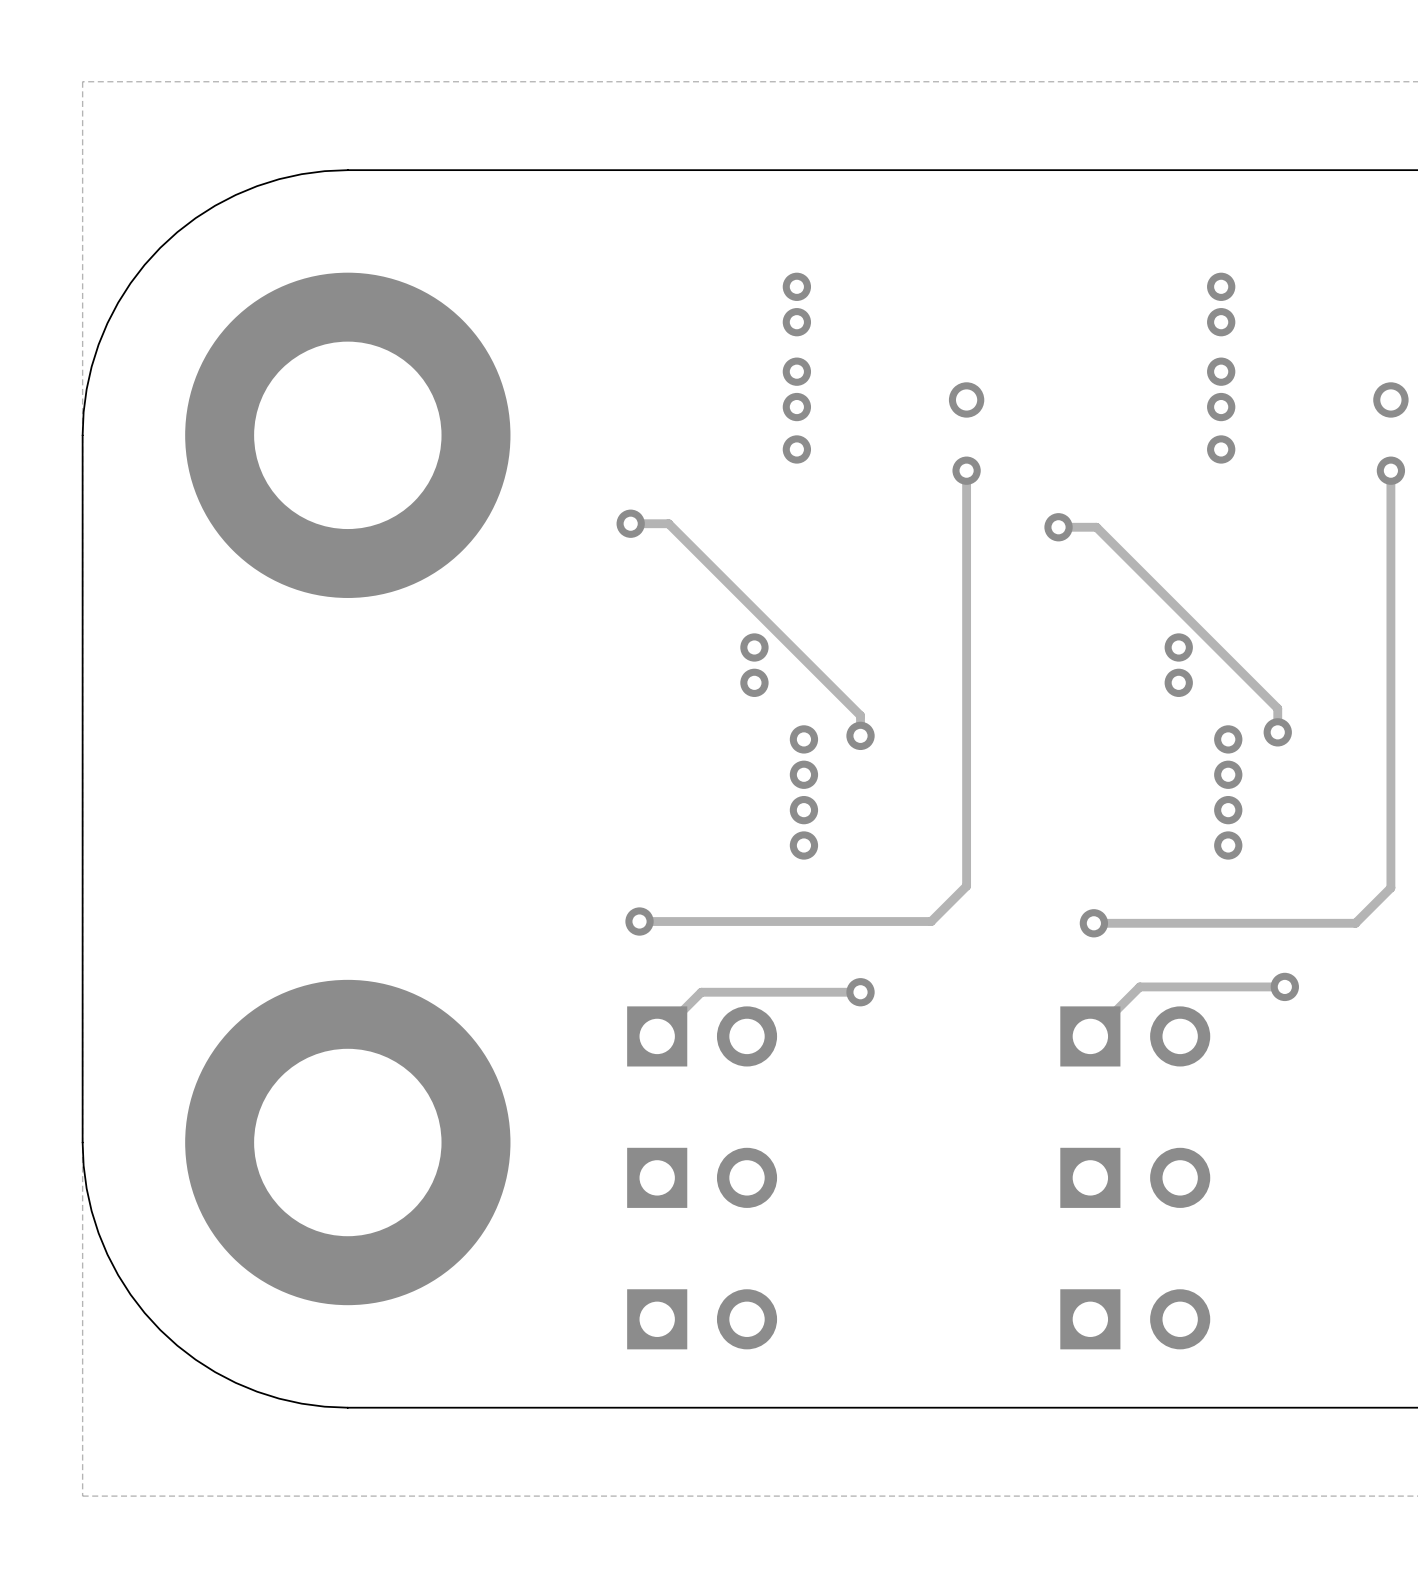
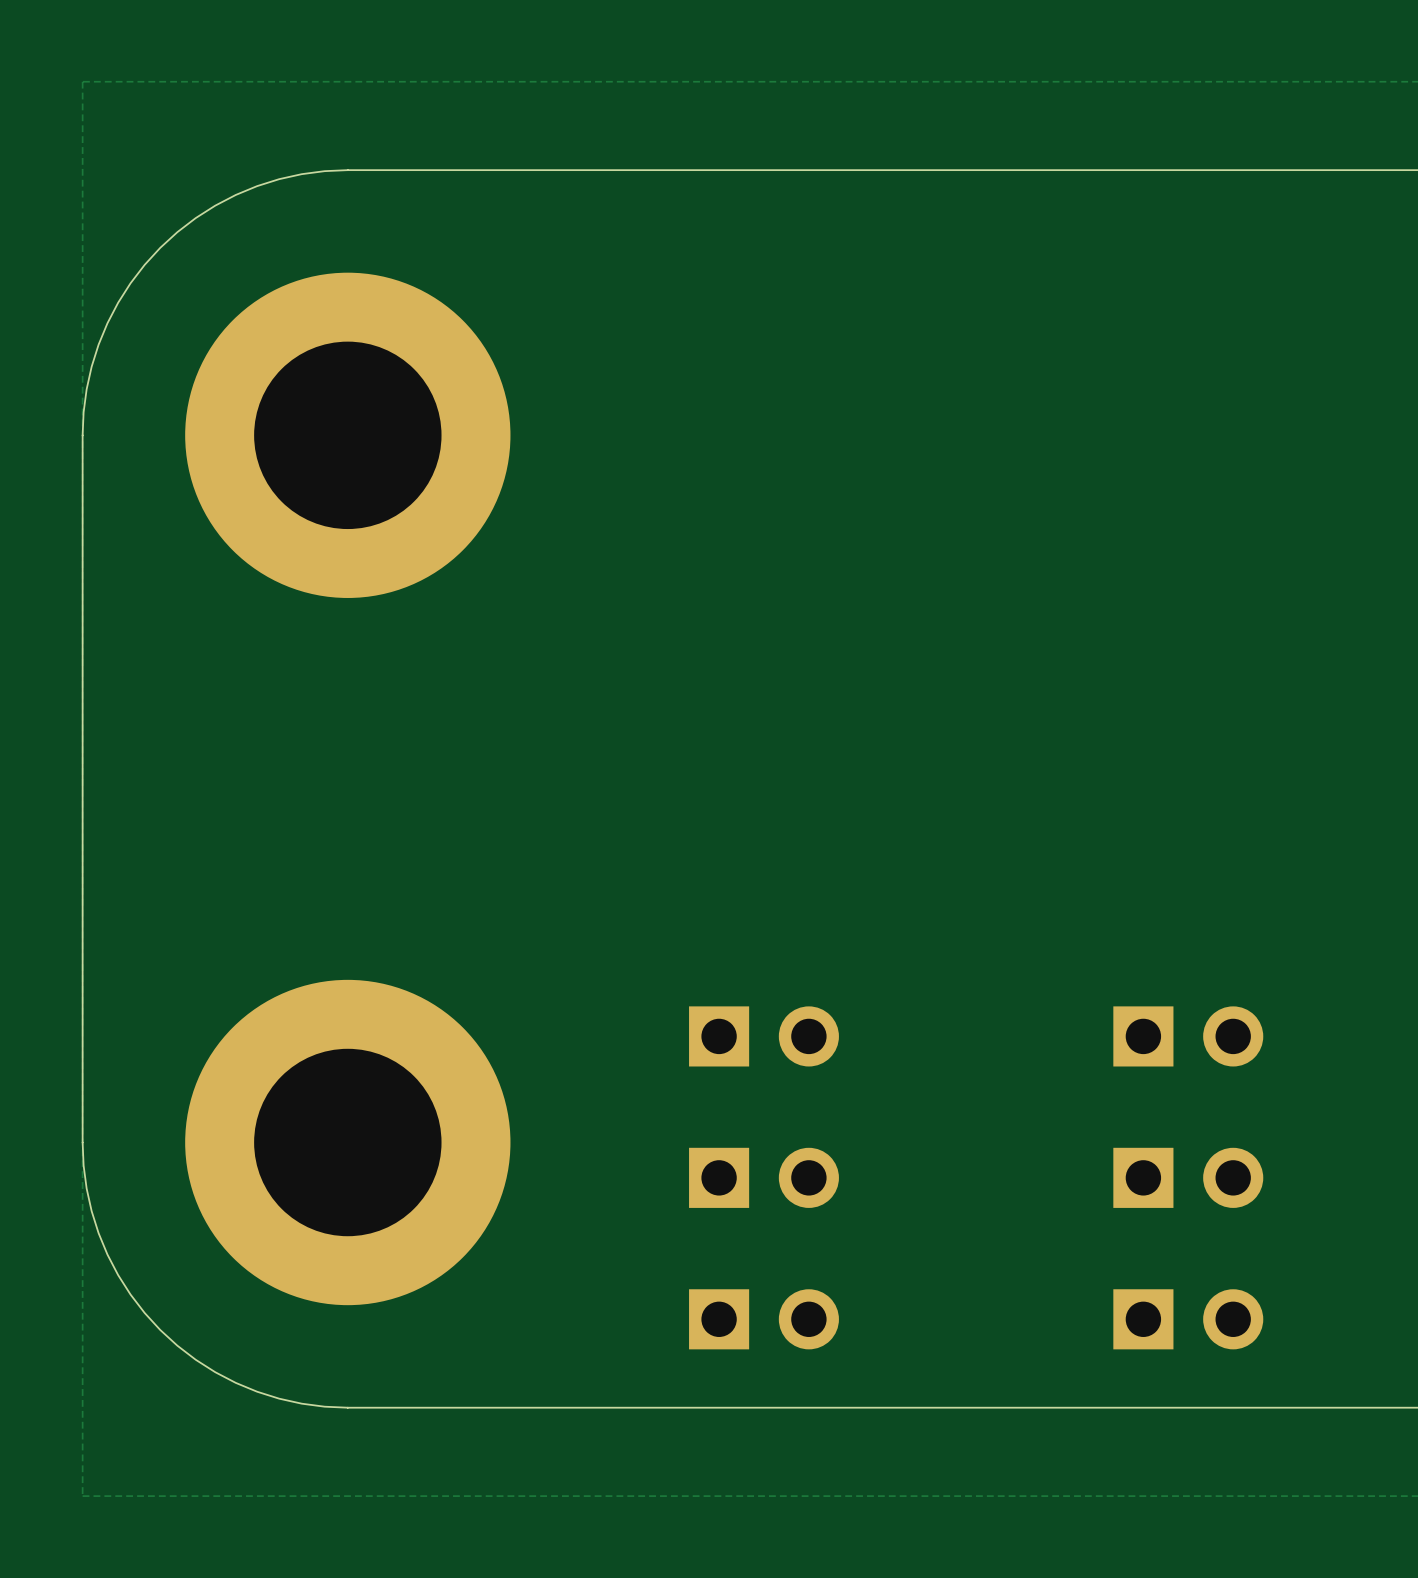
via: (796, 286) -> none
via: (1221, 286) -> none
via: (796, 322) -> none
via: (1221, 322) -> none
via: (796, 371) -> none
via: (1221, 371) -> none
via: (966, 399) -> none
via: (1390, 399) -> none
via: (796, 407) -> none
via: (1221, 407) -> none
via: (796, 449) -> none
via: (1221, 449) -> none
track: (966, 470) (966, 886) (931, 921) (639, 921) -> none
via: (966, 470) -> none
track: (1390, 470) (1390, 887) (1355, 923) (1093, 923) -> none
via: (1390, 470) -> none
track: (630, 523) (668, 523) (860, 715) (860, 735) -> none
via: (630, 523) -> none
track: (1058, 527) (1096, 527) (1277, 708) (1277, 732) -> none
via: (1058, 527) -> none
via: (754, 647) -> none
via: (1178, 647) -> none
via: (754, 682) -> none
via: (1178, 682) -> none
via: (1277, 732) -> none
via: (860, 735) -> none
via: (803, 739) -> none
via: (1228, 739) -> none
via: (803, 774) -> none
via: (1228, 774) -> none
via: (803, 810) -> none
via: (1228, 810) -> none
via: (803, 845) -> none
via: (1228, 845) -> none
via: (639, 921) -> none
via: (1093, 923) -> none
track: (1284, 986) (1139, 986) (1090, 1036) -> none
via: (1284, 986) -> none
track: (860, 992) (701, 992) (657, 1036) -> none
via: (860, 992) -> none
part position: (702, 1036) -> (763, 1036)
part position: (1135, 1036) -> (1188, 1036)
part position: (702, 1177) -> (763, 1177)
part position: (1135, 1177) -> (1188, 1177)
part position: (702, 1319) -> (763, 1319)
part position: (1135, 1319) -> (1188, 1319)

